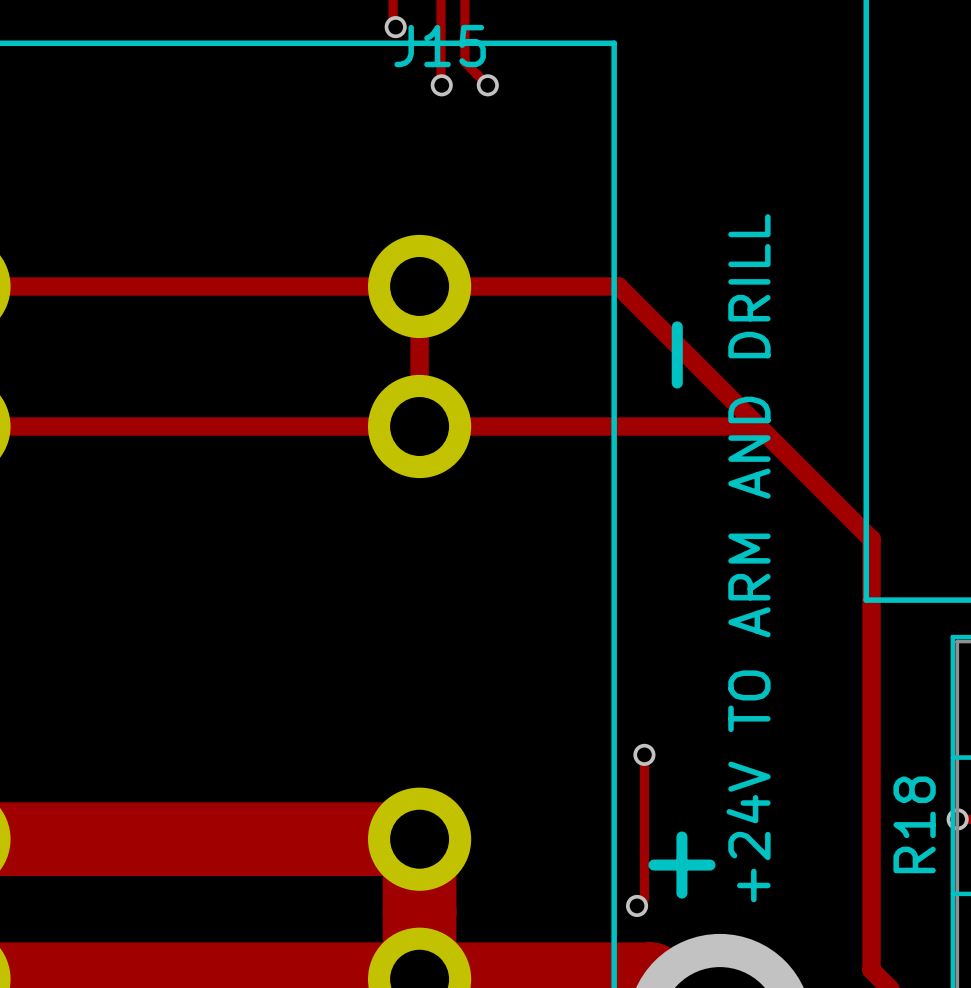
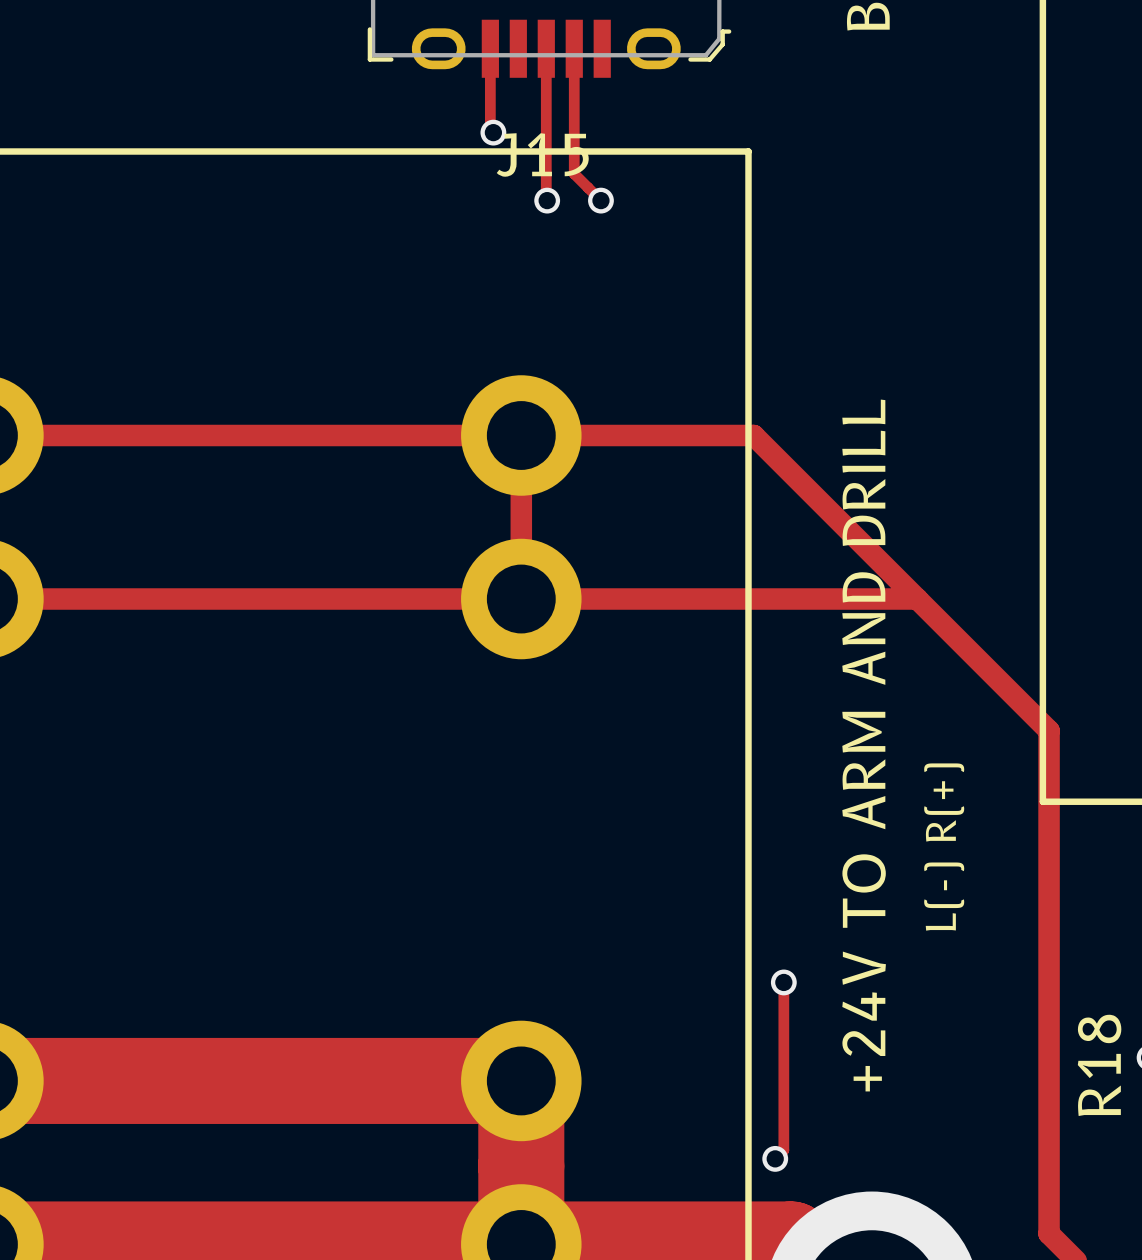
text: - (677, 354) -> none
+24V TO ARM AND DRILL name position: +24V TO ARM AND DRILL (748, 558) -> +24V TO ARM AND DRILL (864, 745)
text: none -> L(-) R(+) (944, 847)
text: + (681, 865) -> none

